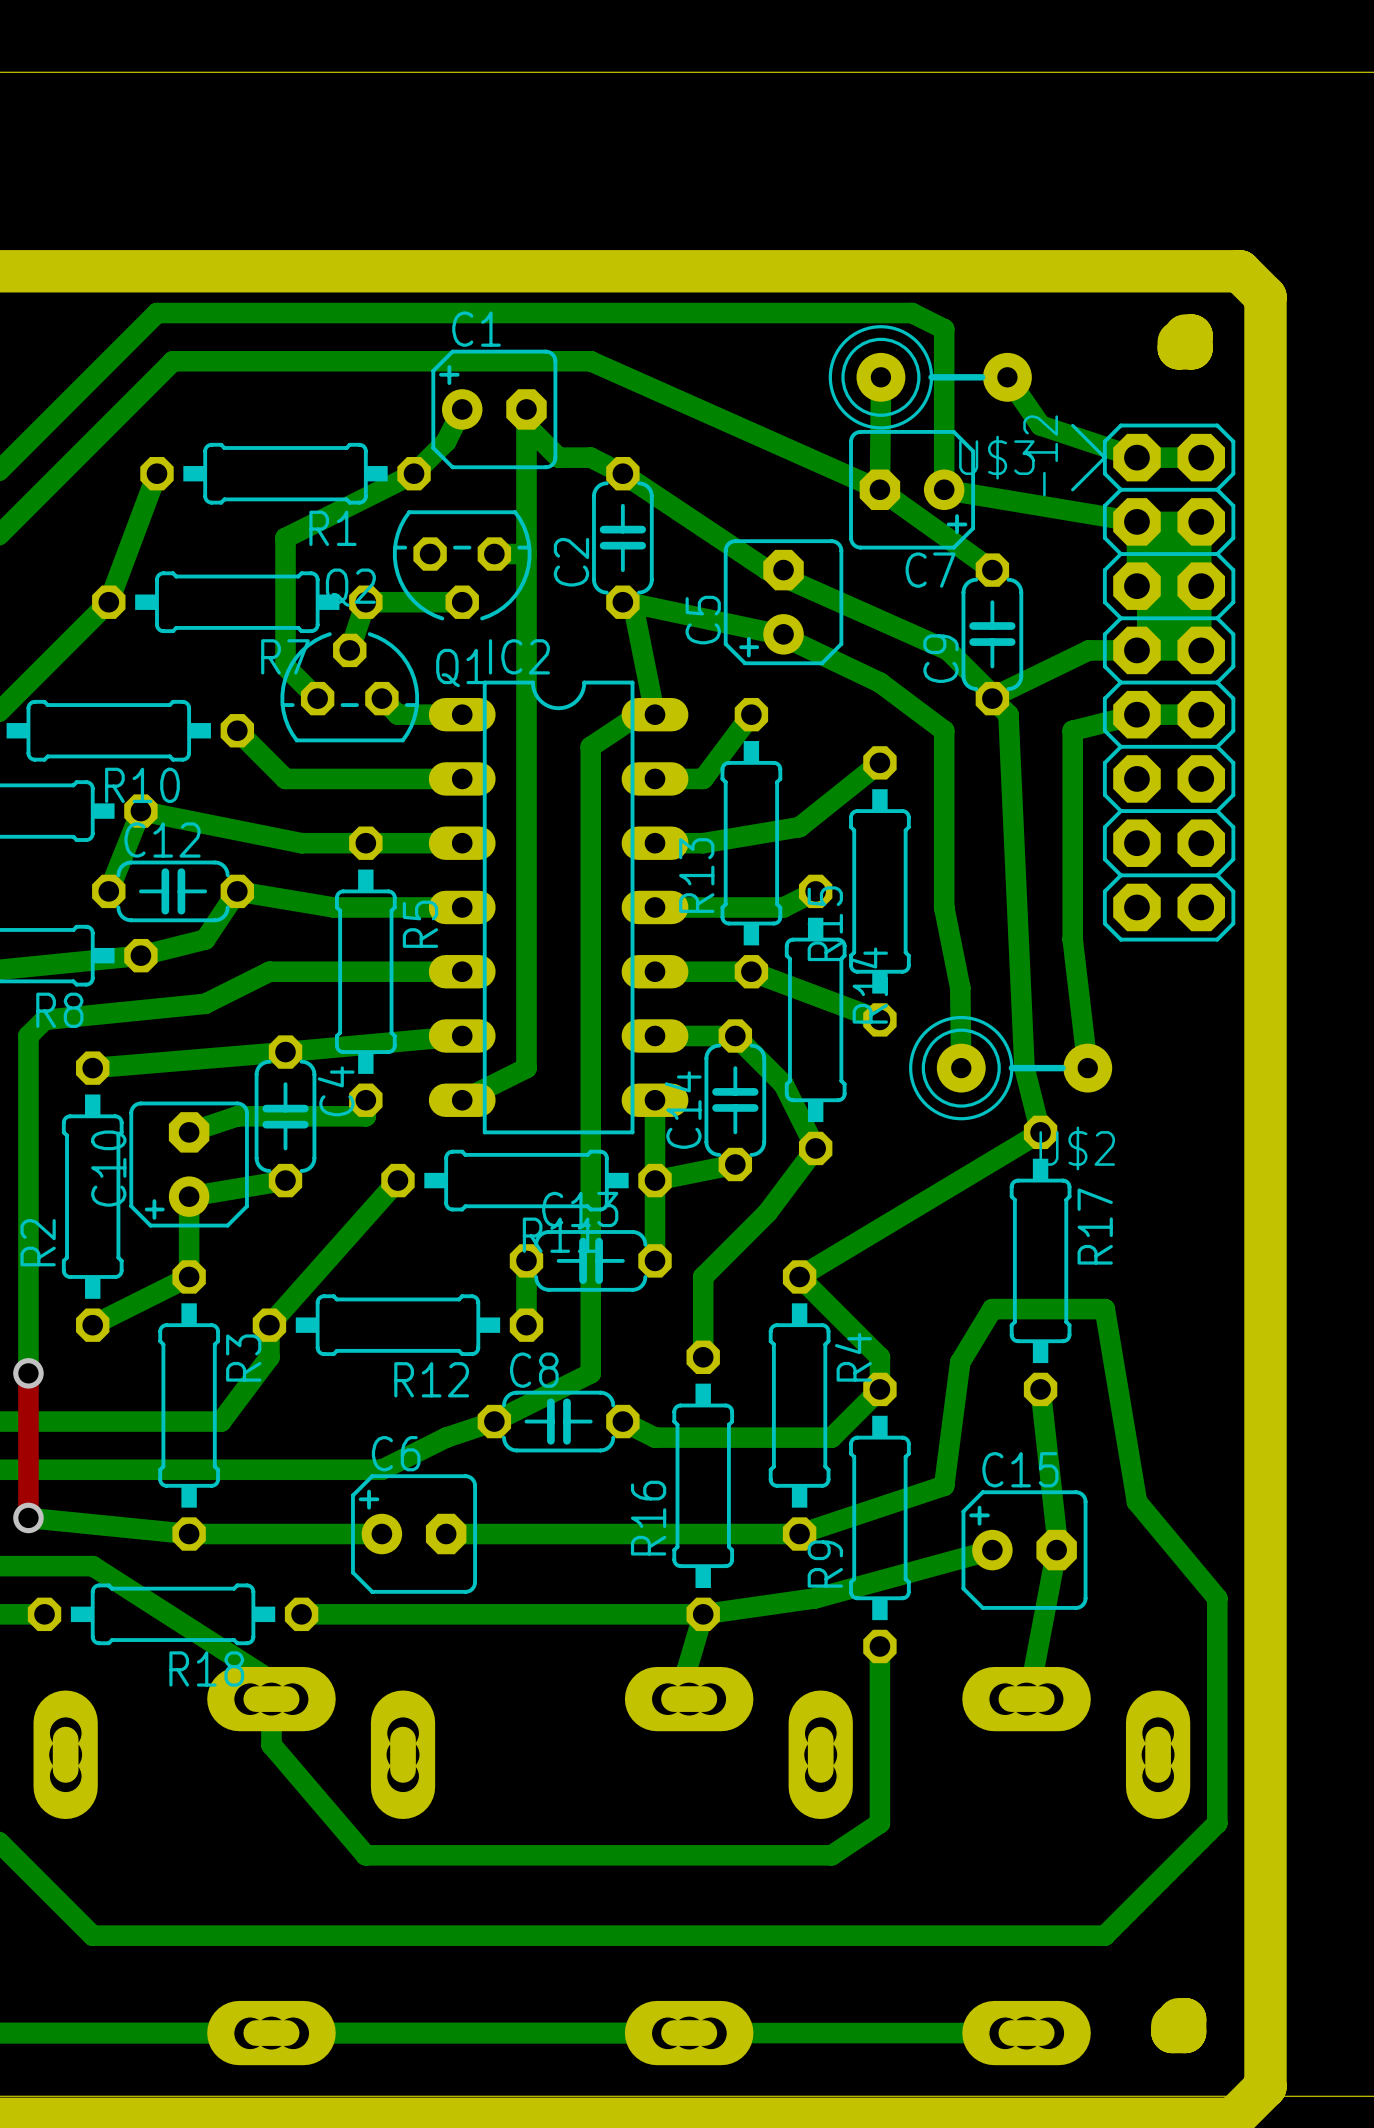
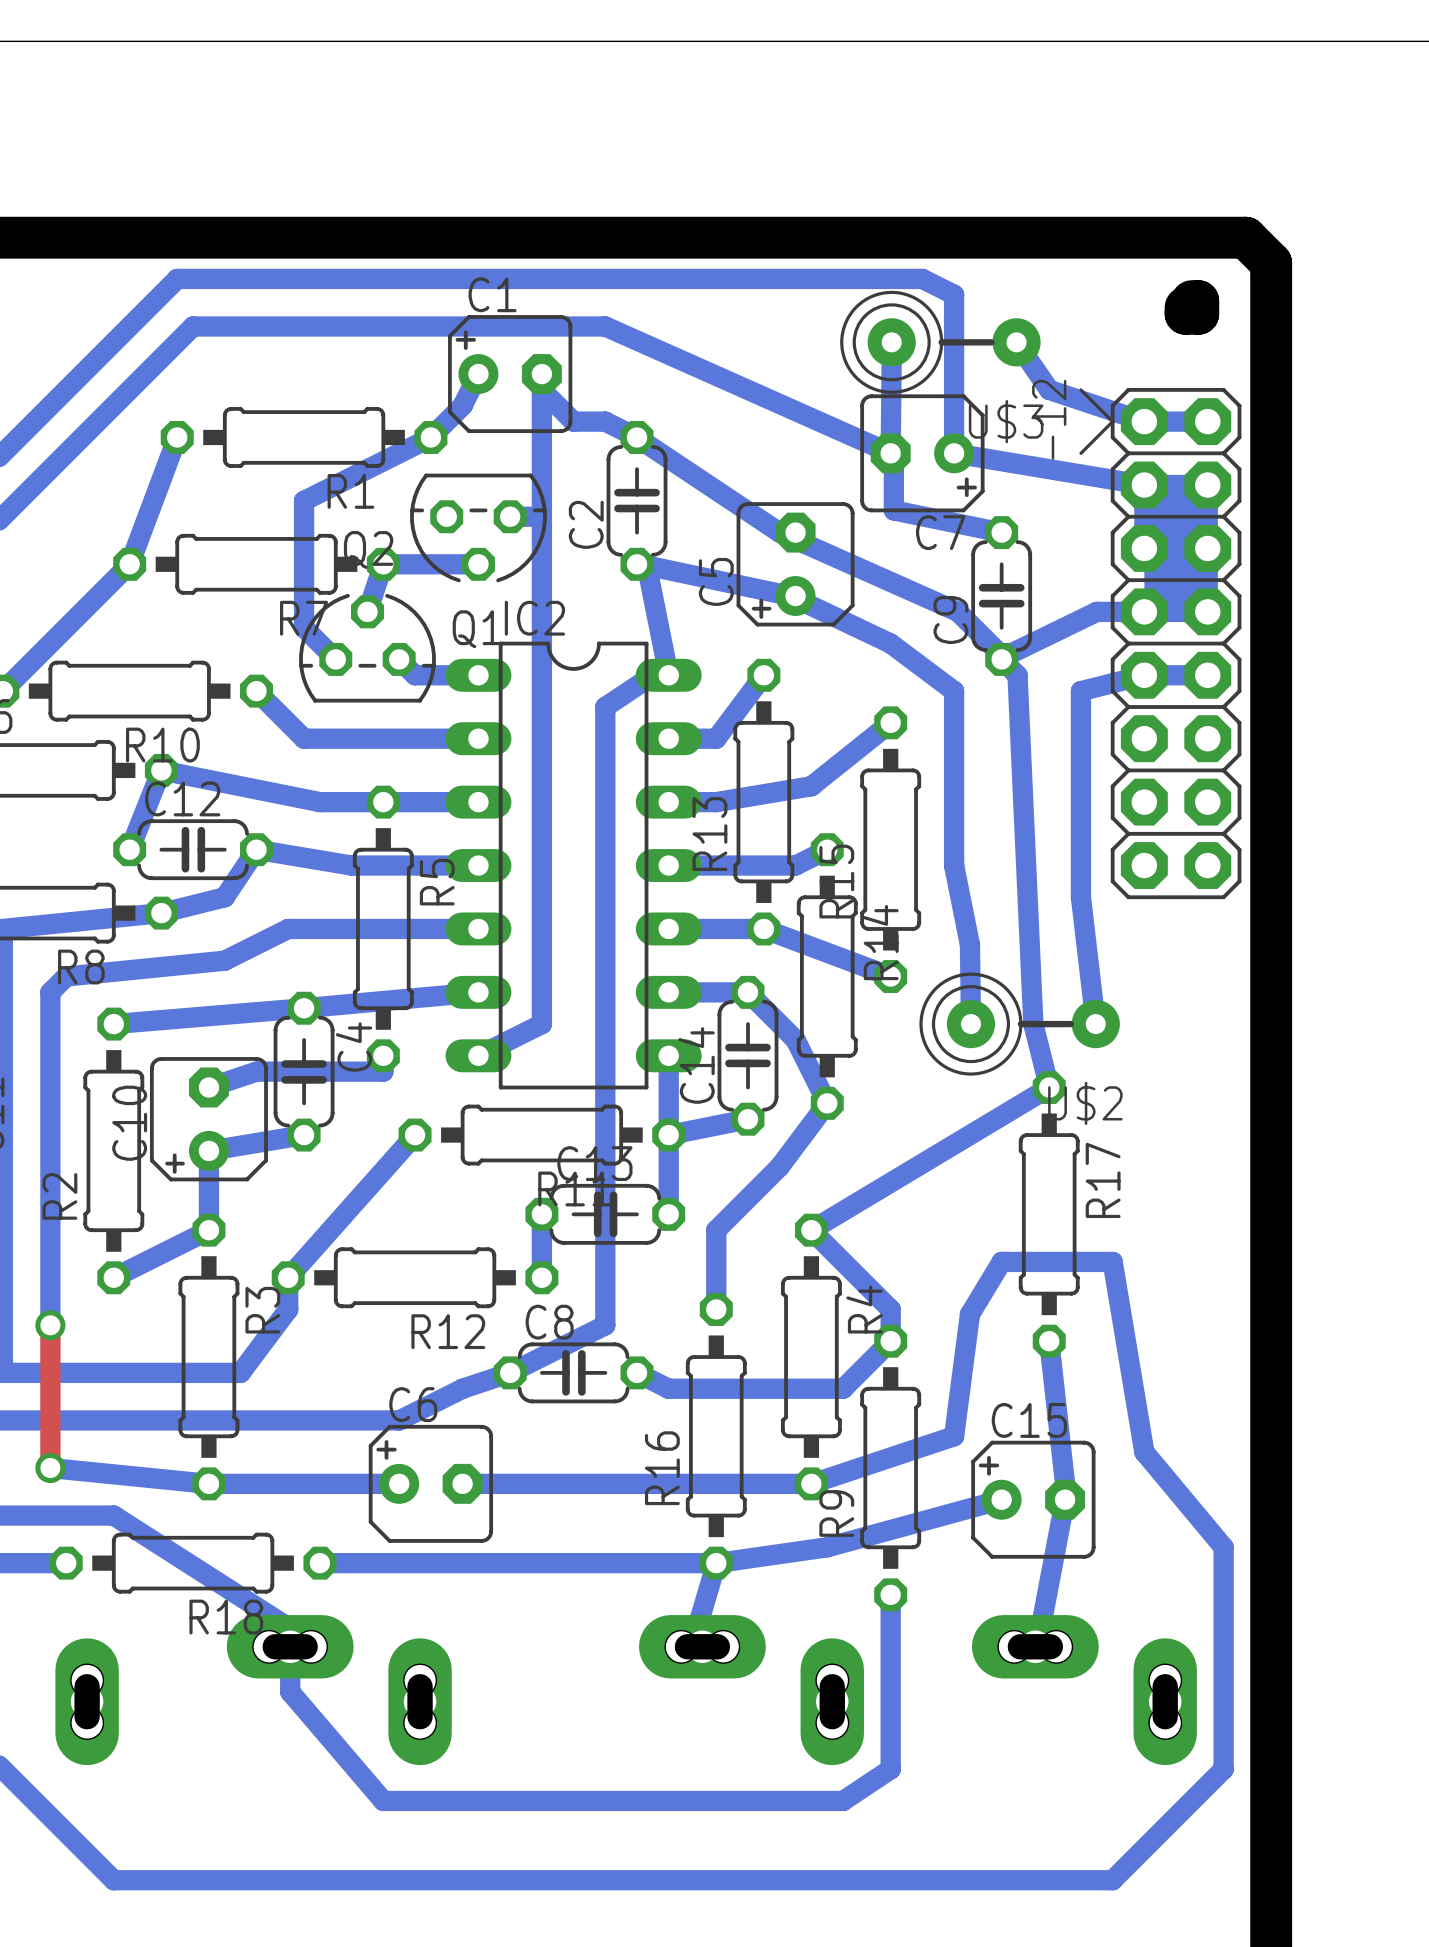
bottom track: (879, 489) (992, 570) -> (890, 453) (893, 453) (893, 510) (1001, 532)

